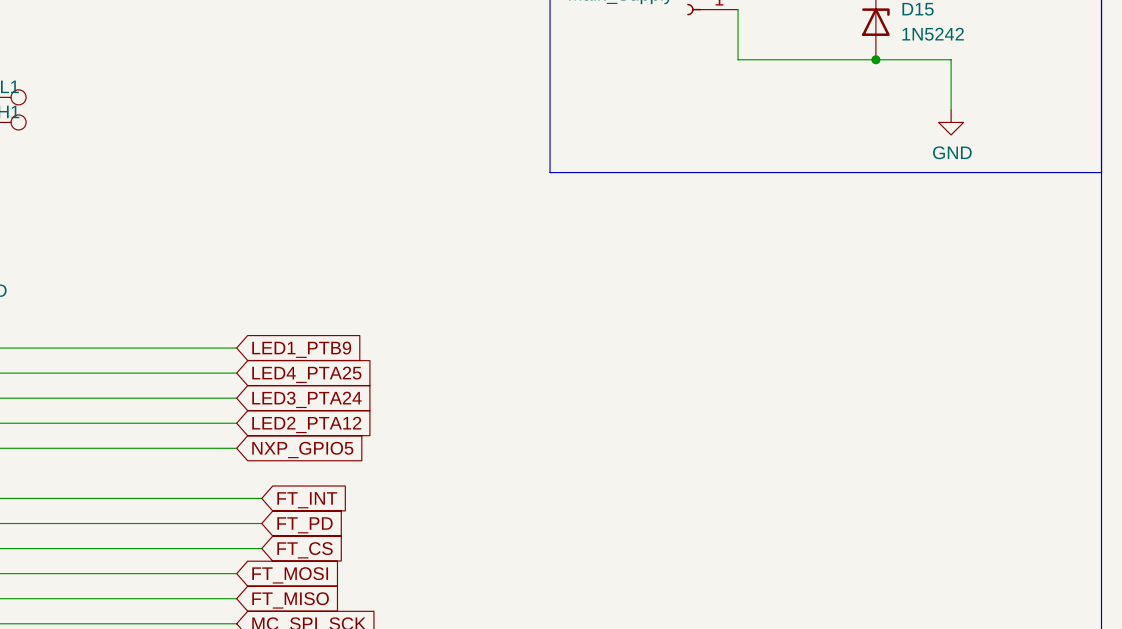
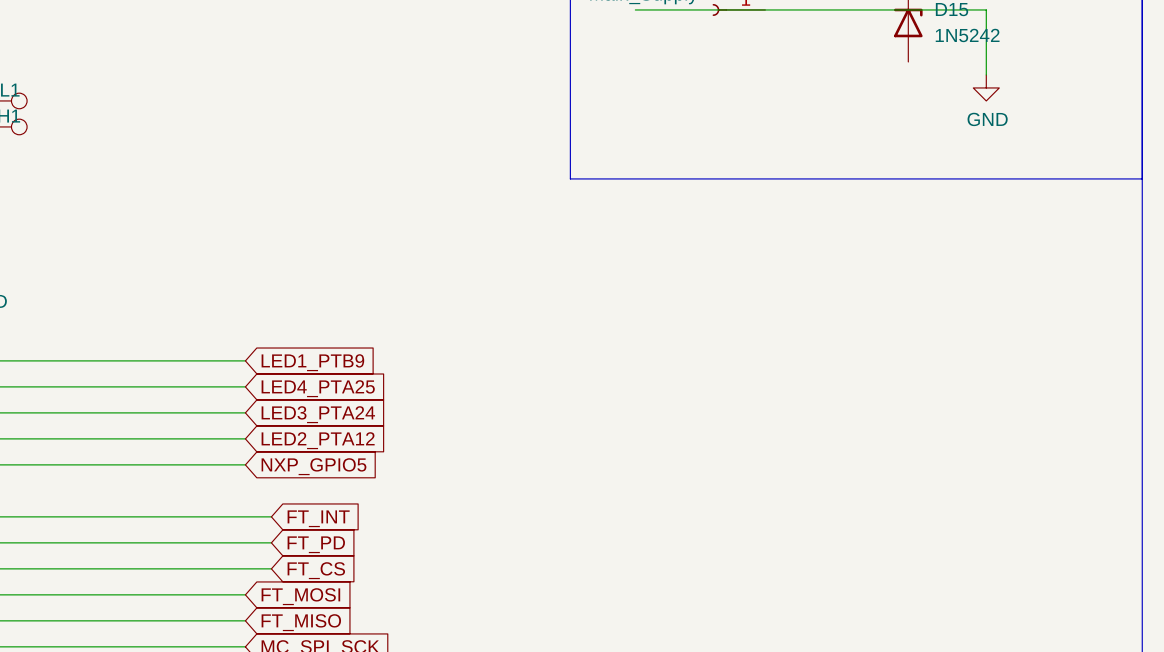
wire: (738, 9) (738, 59) (951, 59) -> (635, 9) (986, 9) (986, 61)
junction: (875, 59) -> none
wire: (951, 72) (951, 109) -> none
power symbol position: GND (951, 122) -> GND (986, 87)

